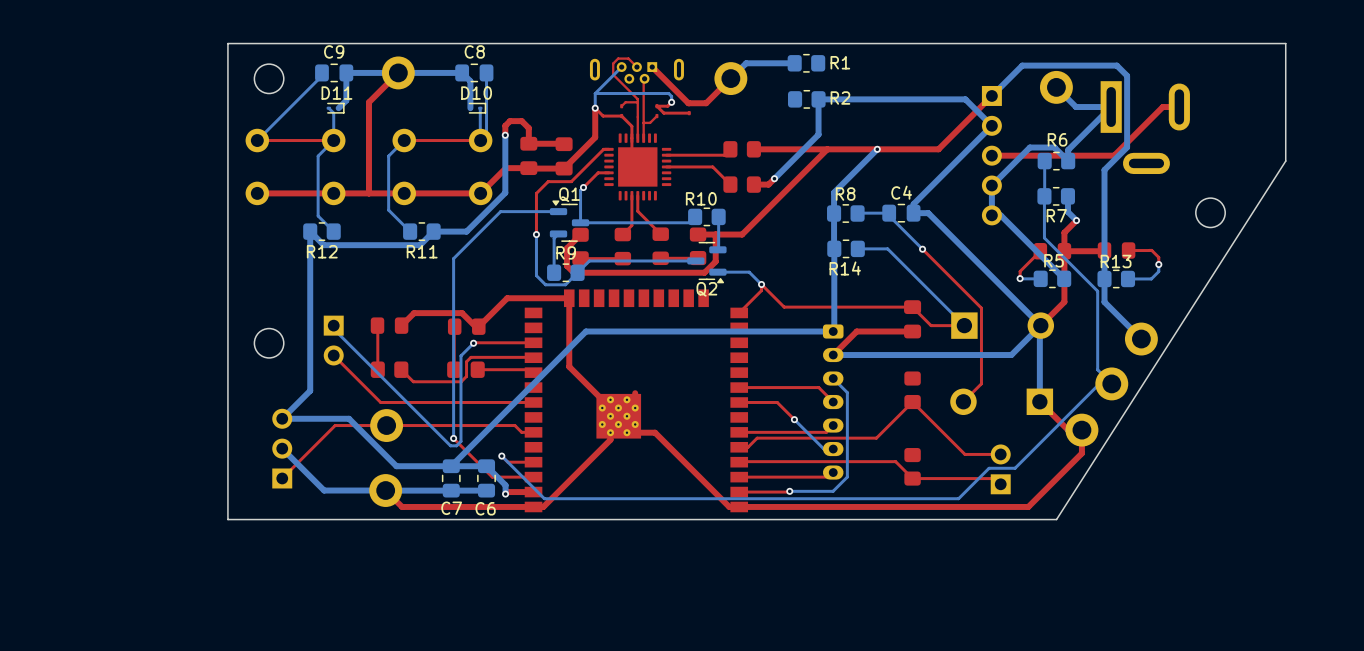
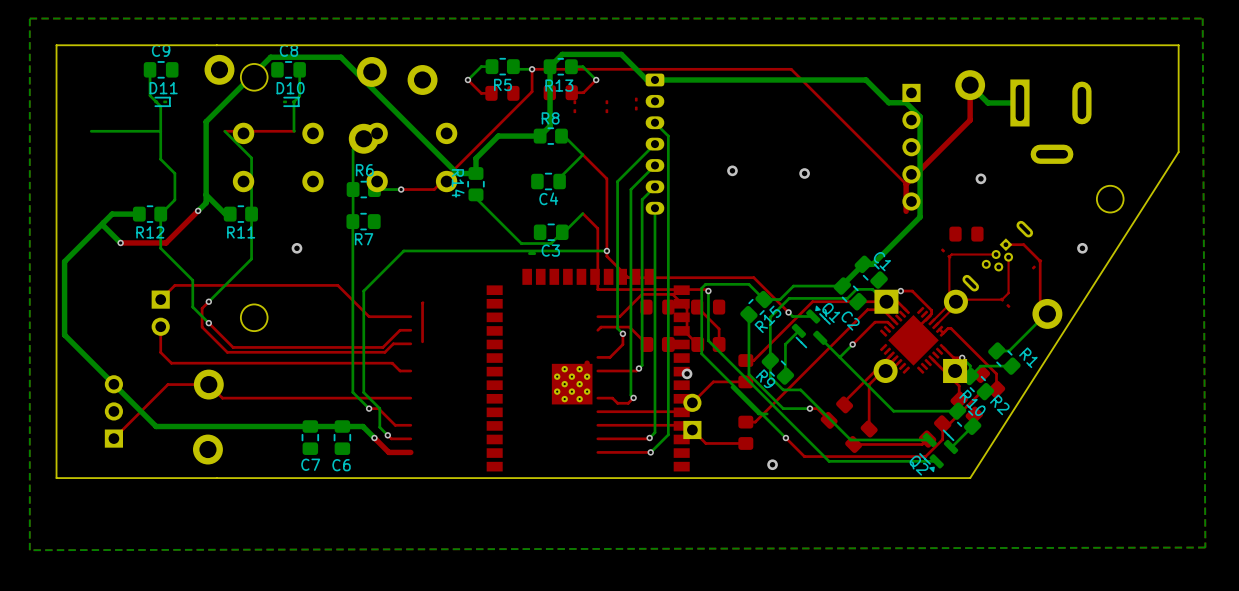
bottom zone outline: none -> (1202, 18) (1205, 547) (29, 550) (29, 18) (1202, 18)
board edge: (227, 43) (227, 519) -> (216, 45) (56, 45) (56, 478) (216, 478)
bottom track: (794, 63) (746, 63) (722, 86) -> none
R1 rotation: 0° (806, 63) -> 45° clockwise (1004, 358)
R1 position: (806, 63) -> (1004, 358)
bottom track: none -> (492, 66) (481, 66) (467, 79)
bottom track: none -> (513, 66) (516, 69) (532, 69)
bottom track: none -> (571, 66) (582, 66) (596, 79)
bottom track: (621, 67) (595, 93) (668, 93) (671, 96) (671, 102) -> none
top track: (636, 67) (628, 58) (618, 58) (613, 63) (613, 74) (637, 99) (637, 138) -> none
top track: (652, 67) (688, 103) (706, 103) (730, 78) -> none
via: none -> (532, 69)
bottom track: none -> (150, 69) (150, 95) (160, 106) (160, 159) (174, 173) (174, 199) (160, 214) (160, 248) (192, 280) (192, 307) (208, 323)
part: none -> (219, 69)
bottom track: none -> (299, 69) (299, 96) (293, 101) (294, 131)
part: (636, 71) -> none
bottom track: (321, 72) (321, 75) (257, 140) -> none
C9 position: (334, 72) -> (161, 69)
top track: (398, 72) (368, 102) (368, 193) -> none
C8 position: (474, 72) -> (288, 69)
bottom track: (486, 72) (486, 134) (480, 140) (480, 108) -> none
top track: (644, 78) (643, 138) -> none
part: (730, 78) -> none
part: none -> (422, 79)
top track: none -> (467, 79) (481, 93) (491, 93)
via: none -> (467, 79)
top track: none -> (596, 79) (583, 92) (571, 92)
via: none -> (596, 79)
top track: none -> (970, 85) (970, 120) (906, 184)
part: none -> (560, 92)
top track: (991, 95) (938, 149) (753, 149) -> none
bottom track: (991, 95) (1022, 65) (1116, 65) (1127, 75) (1127, 147) (1104, 169) (1104, 302) (1141, 339) -> none
part: none -> (502, 93)
R2 rotation: 0° (806, 99) -> 45° clockwise (977, 384)
R2 position: (806, 99) -> (977, 384)
top track: (637, 102) (625, 102) (621, 106) -> none
top track: (671, 102) (667, 106) (656, 106) (663, 113) (689, 113) -> none
via: (671, 102) -> none
bottom track: (1111, 107) (1068, 150) (1068, 161) (1054, 147) (1029, 147) (991, 185) (991, 215) (1000, 215) (1064, 278) -> none
top track: (1179, 107) (1162, 107) (1114, 155) (991, 155) -> none
bottom track: (328, 108) (333, 113) (333, 140) (318, 156) (318, 216) (333, 231) -> none
D11 position: (335, 108) -> (162, 101)
bottom track: (470, 108) (470, 81) (462, 72) (346, 72) (346, 100) (338, 108) -> none
D10 position: (477, 108) -> (291, 101)
via: (595, 108) -> none
top track: (656, 116) (650, 122) (643, 122) -> none
bottom track: none -> (654, 122) (668, 136) (668, 434) (650, 452)
top track: (505, 135) (505, 125) (510, 121) (521, 121) (528, 128) (528, 143) (564, 144) -> none
bottom track: (505, 135) (505, 192) (466, 231) (433, 231) (420, 245) (323, 245) (310, 231) (310, 390) (282, 418) (349, 418) (396, 466) (486, 466) (505, 485) (505, 494) -> none
via: (505, 135) -> none
bottom track: none -> (160, 131) (91, 131)
bottom track: none -> (224, 131) (251, 158) (251, 258) (208, 301)
top track: (333, 140) (257, 140) -> (294, 131) (224, 131)
bottom track: (404, 140) (388, 156) (388, 210) (410, 231) -> none
top track: (480, 140) (404, 140) -> none
bottom track: none -> (561, 136) (564, 136) (582, 154) (559, 178) (559, 181)
bottom track: none -> (363, 138) (353, 149) (352, 392) (369, 408)
part: none -> (363, 138)
top track: (608, 149) (603, 149) (571, 181) (548, 181) (536, 193) (536, 234) -> none
top track: (730, 149) (724, 155) (666, 155) -> none
part: (742, 149) -> none
top track: (827, 149) (742, 234) (698, 234) -> none
bottom track: (877, 149) (834, 192) (834, 248) -> none
via: (877, 149) -> none
bottom track: none -> (654, 144) (617, 181) (617, 328) (622, 333)
part: (528, 155) -> none
part: (564, 156) -> none
bottom track: (1044, 161) (1044, 237) (1097, 291) (1097, 369) (1111, 383) (1099, 383) (1015, 468) (989, 468) (958, 498) (544, 498) (501, 456) -> none
R6 position: (1056, 161) -> (363, 189)
top track: none -> (582, 154) (606, 178) (606, 256) (628, 277) (753, 277) (788, 312)
top track: (637, 166) (631, 161) (631, 126) (621, 116) (603, 116) (595, 108) (595, 137) (564, 168) (505, 168) (480, 193) (257, 193) -> none
part: (637, 166) -> none
top track: (666, 166) (712, 166) (730, 184) -> none
top track: (608, 172) (598, 172) (583, 187) -> none
bottom track: none -> (654, 165) (630, 189) (630, 395) (633, 397)
top track: (774, 178) (768, 184) (753, 184) -> none
bottom track: (774, 178) (818, 134) (818, 99) (965, 99) (991, 125) (913, 204) (913, 213) (928, 213) (1040, 325) (1011, 355) (833, 355) -> none
via: (774, 178) -> none
via: none -> (732, 170)
part: (742, 184) -> none
via: none -> (804, 173)
bottom track: (583, 187) (580, 190) (580, 222) (689, 222) (695, 216) -> none
via: (583, 187) -> none
via: none -> (980, 178)
C4 name position: C4 (901, 192) -> C4 (548, 198)
top track: (631, 195) (631, 225) (622, 234) -> none
top track: (637, 195) (637, 211) (660, 234) -> none
top track: none -> (906, 184) (791, 69) (532, 69) (532, 91) (434, 189) (401, 189)
top track: none -> (906, 184) (906, 211)
R7 position: (1056, 196) -> (363, 221)
bottom track: (1067, 196) (1067, 211) (1076, 220) -> none
bottom track: none -> (654, 186) (642, 199) (642, 365) (638, 368)
bottom track: none -> (401, 189) (374, 189)
via: none -> (401, 189)
bottom track: none -> (206, 194) (225, 214) (230, 214)
bottom track: none -> (475, 194) (475, 198) (521, 243) (551, 243) (582, 213)
bottom track: (558, 211) (500, 211) (453, 258) (453, 438) -> none
R8 position: (845, 213) -> (550, 136)
bottom track: (857, 213) (889, 213) (889, 215) (922, 249) -> none
C4 position: (901, 213) -> (548, 181)
R10 rotation: 0° (706, 216) -> 45° clockwise (965, 418)
R10 position: (706, 216) -> (965, 418)
bottom track: (718, 216) (717, 249) -> none
top track: (1076, 220) (1064, 232) (1064, 302) (1040, 325) -> none
via: (1076, 220) -> none
Q1 rotation: 0° (569, 221) -> 45° clockwise (811, 326)
Q1 position: (569, 221) -> (811, 326)
bottom track: none -> (654, 208) (654, 432) (649, 438)
top track: none -> (198, 210) (166, 242) (120, 242)
bottom track: none -> (198, 210) (206, 202) (206, 121) (270, 57) (341, 57) (457, 173) (475, 173) (475, 158) (498, 136) (540, 136) (550, 126) (550, 66) (562, 54) (621, 54) (646, 79) (866, 79) (888, 102) (906, 102) (920, 116) (920, 217) (872, 264) (863, 264) (842, 286) (793, 286) (780, 299) (764, 299) (748, 284) (705, 284) (701, 288) (701, 353) (785, 438)
via: none -> (198, 210)
top track: none -> (582, 213) (597, 228) (597, 289) (708, 291)
bottom track: none -> (139, 214) (112, 214) (64, 261) (64, 334) (156, 426) (362, 426) (374, 438)
R12 position: (321, 231) -> (150, 214)
R11 position: (421, 231) -> (240, 214)
bottom track: (558, 233) (554, 238) (554, 272) -> none
bottom track: (536, 234) (536, 275) (545, 284) (565, 284) (589, 260) (695, 260) -> none
via: (536, 234) -> none
top track: (715, 234) (715, 261) (704, 272) (573, 272) (566, 265) (566, 248) (580, 234) -> none
bottom track: none -> (103, 222) (103, 225) (120, 242)
R15 side: top (580, 246) -> bottom (756, 307)
part: (622, 246) -> none
part: (660, 246) -> none
part: (698, 246) -> none
bottom track: (834, 248) (833, 331) (585, 331) (451, 466) -> none
R14 rotation: 0° (846, 248) -> 90° clockwise (475, 184)
R14 position: (846, 248) -> (475, 184)
bottom track: (857, 248) (887, 248) (964, 325) -> none
C3: none -> (551, 232)
top track: (922, 249) (981, 308) (981, 383) (963, 401) -> none
via: (922, 249) -> none
top track: (1104, 250) (1064, 251) -> none
part: (1116, 250) -> none
top track: (1149, 250) (1158, 257) (1158, 264) -> none
top track: (1149, 250) (1128, 250) -> none
top track: (1040, 251) (1020, 271) (1020, 278) -> none
R9 name position: R9 (566, 252) -> R9 (765, 378)
top track: (580, 258) (622, 258) -> none
top track: (698, 258) (660, 258) -> none
via: none -> (120, 242)
R5 name position: R5 (1054, 260) -> R5 (502, 84)
R13 name position: R13 (1116, 261) -> R13 (559, 85)
Q2 rotation: 0° (706, 262) -> 45° clockwise (938, 450)
Q2 position: (706, 262) -> (938, 450)
top track: none -> (1005, 244) (1023, 244) (1040, 261) (1040, 304) (1047, 312)
bottom track: (1158, 264) (1158, 271) (1151, 278) (1128, 278) -> none
via: (1158, 264) -> none
via: none -> (296, 248)
via: none -> (1082, 248)
bottom track: none -> (606, 250) (403, 250) (363, 291) (363, 392) (379, 408) (379, 427) (387, 435)
via: none -> (606, 250)
R9 rotation: 0° (565, 272) -> 45° clockwise (777, 368)
R9 position: (565, 272) -> (777, 368)
bottom track: (717, 272) (749, 272) (761, 284) -> none
part: none -> (946, 253)
top track: none -> (996, 254) (951, 254) (949, 256) (949, 304) (932, 321)
part: none -> (997, 256)
top track: none -> (1008, 257) (1008, 293) (1002, 299) (961, 299) (935, 325)
bottom track: (1020, 278) (1040, 278) -> none
via: (1020, 278) -> none
R5 position: (1052, 278) -> (502, 66)
R13 position: (1116, 278) -> (560, 66)
via position: (761, 284) -> (708, 291)
part: none -> (1037, 264)
C1: none -> (871, 272)
top track: (739, 312) (761, 290) (761, 284) (784, 307) (912, 307) (931, 325) -> (745, 360) (753, 360) (812, 301) (856, 301)
bottom track: none -> (708, 291) (708, 340) (829, 461) (936, 461)
top track: none -> (900, 291) (912, 291) (931, 310) (931, 313) (913, 332) (913, 340)
via: none -> (900, 291)
C2: none -> (850, 293)
part: (912, 319) -> none
top track: none -> (160, 299) (174, 285) (337, 285) (369, 316) (410, 316)
top track: none -> (891, 300) (896, 300) (906, 310)
bottom track: none -> (891, 300) (883, 300) (872, 289) (856, 289) (847, 298) (789, 298) (770, 317) (770, 377) (783, 389) (800, 389) (850, 440) (929, 440)
top track: none -> (208, 301) (202, 308) (202, 327) (227, 352) (384, 352) (393, 343) (410, 343)
via: none -> (208, 301)
bottom track: (333, 325) (333, 329) (450, 445) (456, 445) (460, 441) (460, 355) (473, 343) -> none
top track: (377, 325) (377, 369) -> none
part: (389, 325) -> none
top track: (401, 325) (414, 313) (462, 313) (475, 326) (478, 326) (507, 298) (569, 298) (569, 366) (618, 416) -> none
part: (466, 326) -> none
bottom track: (1039, 326) (1039, 401) -> none
part: none -> (1005, 302)
part: none -> (657, 307)
top track: none -> (697, 307) (719, 328) (719, 344)
part: none -> (708, 307)
top track: (912, 331) (856, 331) (833, 355) -> none
bottom track: none -> (788, 312) (792, 316) (813, 316)
via: none -> (788, 312)
bottom track: none -> (1047, 312) (1009, 351) (996, 351)
bottom track: none -> (748, 314) (748, 374) (783, 408) (809, 408)
part position: (333, 340) -> (160, 313)
top track: (533, 342) (473, 343) -> none
top track: none -> (597, 316) (619, 316) (642, 294) (672, 294) (687, 308) (687, 333) (697, 344)
via: (473, 343) -> none
top track: none -> (894, 321) (882, 309) (867, 309) (755, 422) (745, 422)
top track: none -> (208, 323) (233, 347) (382, 347) (400, 330) (410, 330)
via: none -> (208, 323)
top track: none -> (891, 325) (887, 322) (875, 322) (852, 344)
top track: none -> (160, 326) (160, 352) (171, 363) (392, 363) (400, 370) (410, 370)
top track: (333, 355) (380, 402) (533, 402) -> none
top track: none -> (939, 329) (943, 333) (948, 328) (951, 328) (996, 373) (996, 389) (983, 389) (949, 423) (942, 423) (942, 439) (925, 456) (804, 456) (785, 438)
top track: (533, 357) (470, 357) (466, 361) (466, 376) (461, 381) (413, 381) (401, 369) -> none
top track: none -> (597, 330) (600, 327) (629, 327) (646, 344)
bottom track: none -> (798, 330) (785, 344) (785, 376)
top track: none -> (622, 333) (622, 344) (609, 357) (597, 357)
via: none -> (622, 333)
bottom track: none -> (820, 337) (893, 411) (957, 411)
part: none -> (913, 340)
part: (389, 369) -> none
part: (465, 369) -> none
top track: (477, 369) (530, 369) (533, 372) -> none
part: none -> (657, 344)
part: none -> (708, 344)
bottom track: none -> (852, 344) (839, 357)
via: none -> (852, 344)
top track: none -> (943, 347) (953, 357) (962, 357)
bottom track: (833, 378) (847, 392) (847, 477) (833, 491) (789, 491) -> none
part: (1111, 383) -> none
top track: none -> (891, 355) (844, 401) (844, 404)
top track: (739, 387) (818, 387) (833, 402) -> none
bottom track: none -> (962, 357) (970, 365) (970, 376) (980, 366) (1011, 366)
via: none -> (962, 357)
top track: none -> (894, 358) (869, 384) (869, 428)
top track: none -> (932, 358) (959, 386) (959, 400)
part: (912, 390) -> none
top track: none -> (638, 368) (636, 370) (597, 370)
via: none -> (638, 368)
top track: (1039, 401) (1068, 430) (1081, 430) (1081, 453) (1028, 506) (729, 506) (655, 432) (635, 432) -> none
top track: (739, 402) (777, 402) (794, 419) -> none
part: none -> (745, 371)
part position: (833, 402) -> (654, 144)
via: none -> (687, 373)
top track: none -> (745, 381) (713, 381) (683, 411) (597, 411)
part: none -> (988, 381)
part: none -> (208, 384)
via: (794, 419) -> none
part: (386, 425) -> none
top track: (833, 425) (826, 432) (739, 432) -> none
part: (1081, 430) -> none
top track: none -> (410, 398) (222, 398) (208, 384) (167, 384) (113, 438)
top track: none -> (633, 397) (628, 403) (617, 403) (612, 398) (597, 398)
via: none -> (633, 397)
top track: (533, 432) (521, 432) (514, 425) (335, 425) (282, 478) -> none
top track: (610, 432) (610, 439) (543, 506) (402, 506) (385, 490) -> none
top track: (453, 438) (492, 477) (533, 477) -> none
via: (453, 438) -> none
part: none -> (966, 407)
top track: none -> (369, 408) (378, 408) (395, 425) (410, 425)
via: none -> (369, 408)
top track: none -> (809, 408) (817, 408) (829, 420)
via: none -> (809, 408)
top track: (739, 447) (748, 447) (757, 438) (876, 438) (912, 402) (964, 454) (1000, 454) -> none
part: none -> (836, 412)
bottom track: (282, 448) (324, 490) (385, 490) -> none
part position: (282, 448) -> (113, 411)
part: none -> (692, 416)
top track: (501, 456) (507, 462) (533, 462) -> none
via: (501, 456) -> none
top track: none -> (597, 425) (687, 425) (705, 443) (745, 443)
top track: (739, 462) (895, 461) (912, 478) (994, 478) (1000, 484) -> none
bottom track: none -> (972, 426) (951, 446)
part: (912, 466) -> none
part: none -> (935, 431)
part: none -> (745, 432)
part: (1000, 469) -> none
top track: none -> (387, 435) (391, 438) (410, 438)
via: none -> (387, 435)
top track: (833, 472) (828, 477) (739, 477) -> none
part: none -> (861, 436)
top track: none -> (374, 438) (388, 452) (410, 452)
via: none -> (374, 438)
top track: none -> (649, 438) (597, 438)
via: none -> (649, 438)
via: none -> (785, 438)
top track: none -> (927, 439) (922, 444) (853, 444)
C7 position: (451, 478) -> (310, 437)
C6 position: (486, 478) -> (342, 437)
part: none -> (207, 449)
part: (385, 490) -> none
bottom track: (486, 490) (385, 490) -> none
top track: none -> (650, 452) (597, 452)
via: none -> (650, 452)
top track: (789, 491) (739, 492) -> none
via: (789, 491) -> none
top track: (533, 492) (507, 492) (505, 494) -> none
via: (505, 494) -> none
via: none -> (772, 464)

